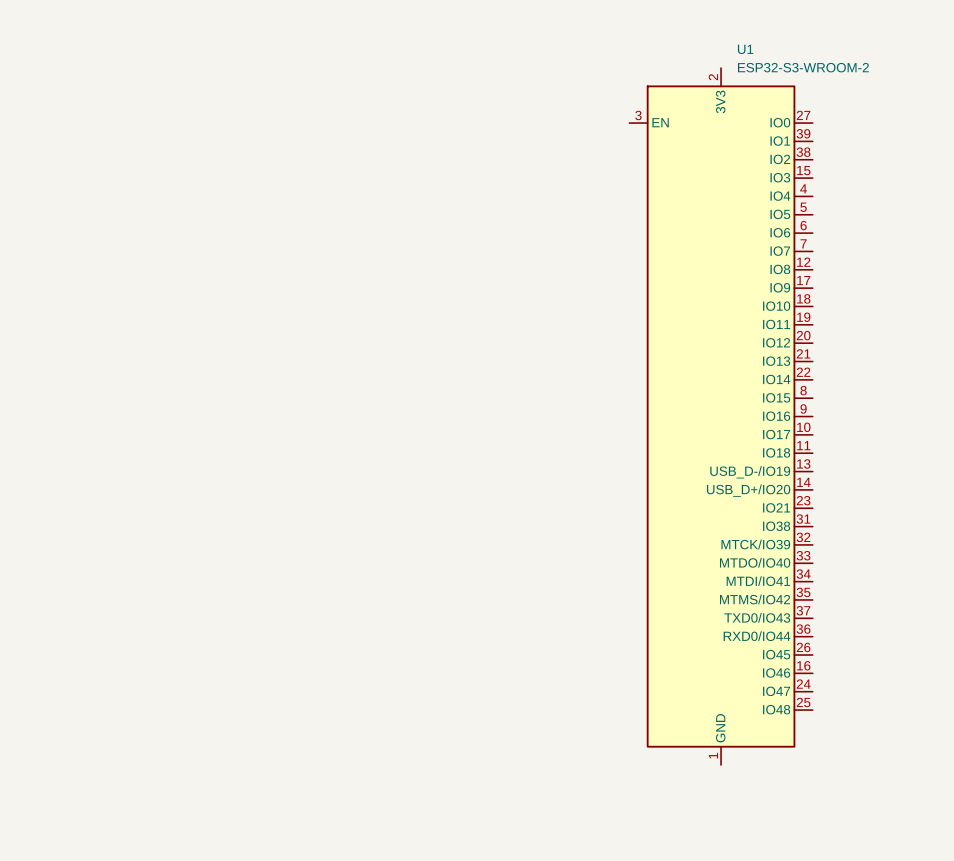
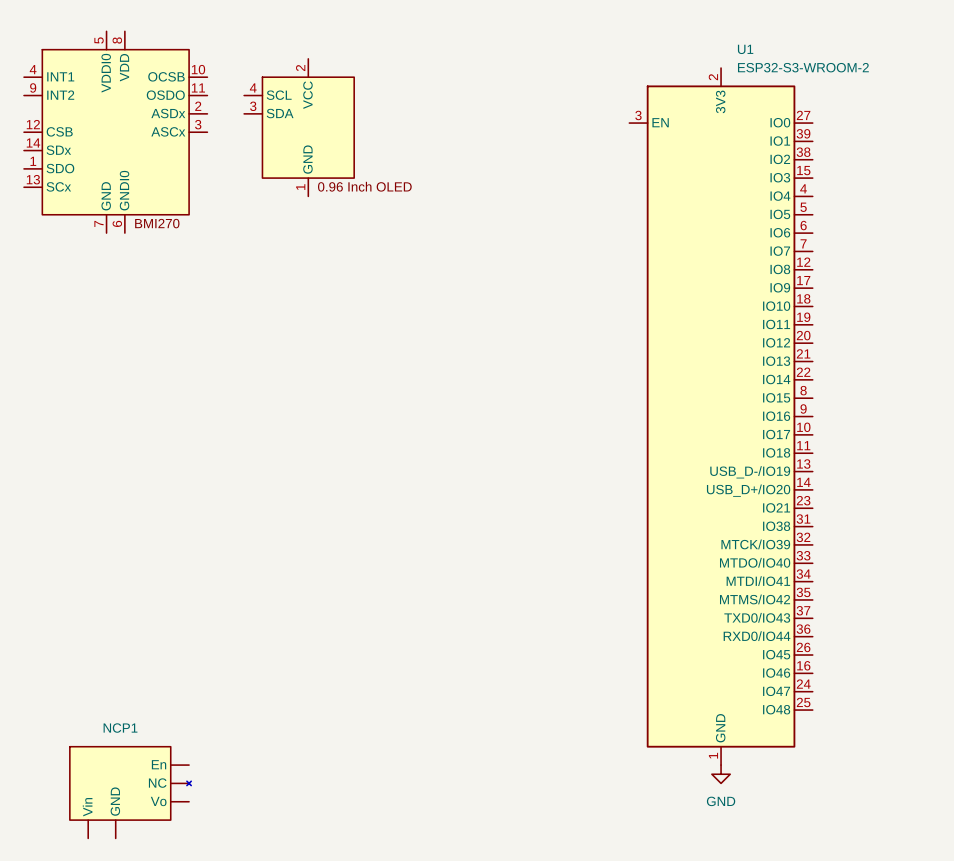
part: none -> (299, 127)
part: none -> (115, 132)
power symbol: none -> GND (721, 774)
NCP1: none -> (130, 792)

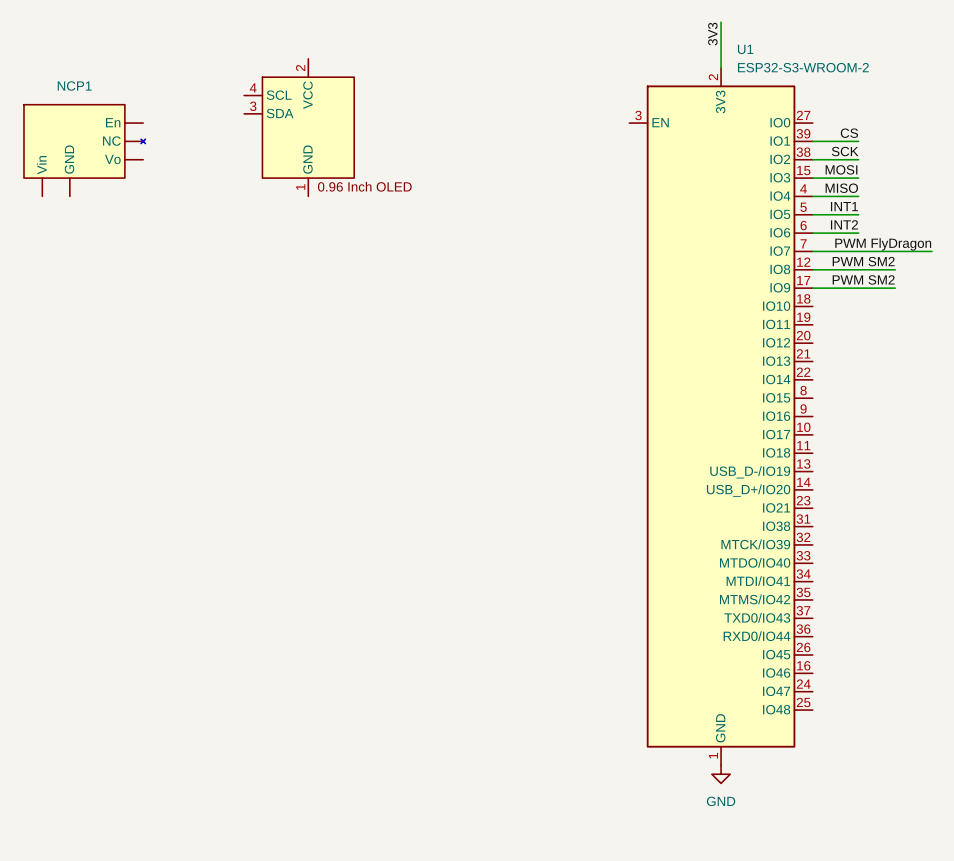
wire: none -> (721, 22) (721, 68)
label: none -> 3V3 (712, 34)
part: (115, 132) -> none
label: none -> CS (849, 133)
wire: none -> (812, 141) (858, 141)
label: none -> SCK (845, 151)
wire: none -> (812, 159) (858, 159)
label: none -> MOSI (841, 169)
wire: none -> (812, 178) (858, 178)
label: none -> MISO (841, 188)
wire: none -> (812, 196) (858, 196)
label: none -> INT1 (844, 206)
wire: none -> (812, 214) (858, 214)
label: none -> INT2 (844, 224)
wire: none -> (812, 233) (858, 233)
label: none -> PWM FlyDragon (883, 244)
wire: none -> (812, 251) (931, 251)
label: none -> PWM SM2 (863, 261)
wire: none -> (812, 269) (895, 269)
label: none -> PWM SM2 (863, 279)
wire: none -> (812, 288) (895, 288)
NCP1 position: (130, 792) -> (84, 150)

